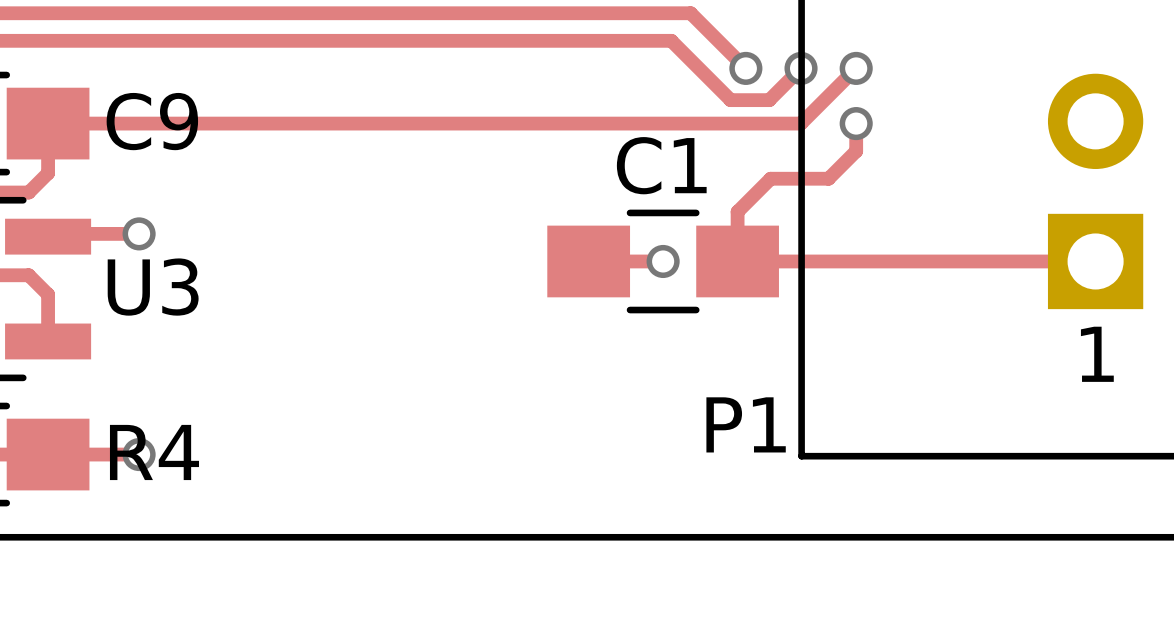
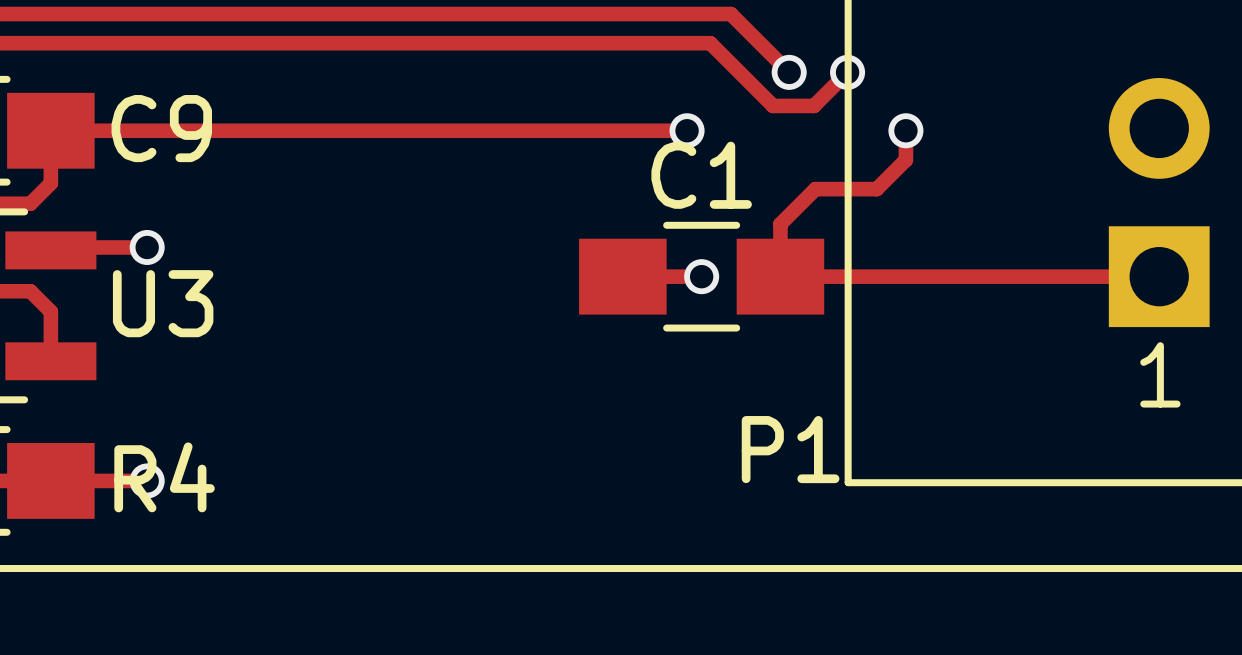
track: (856, 68) (801, 123) (649, 123) -> none
via position: (856, 68) -> (687, 130)

